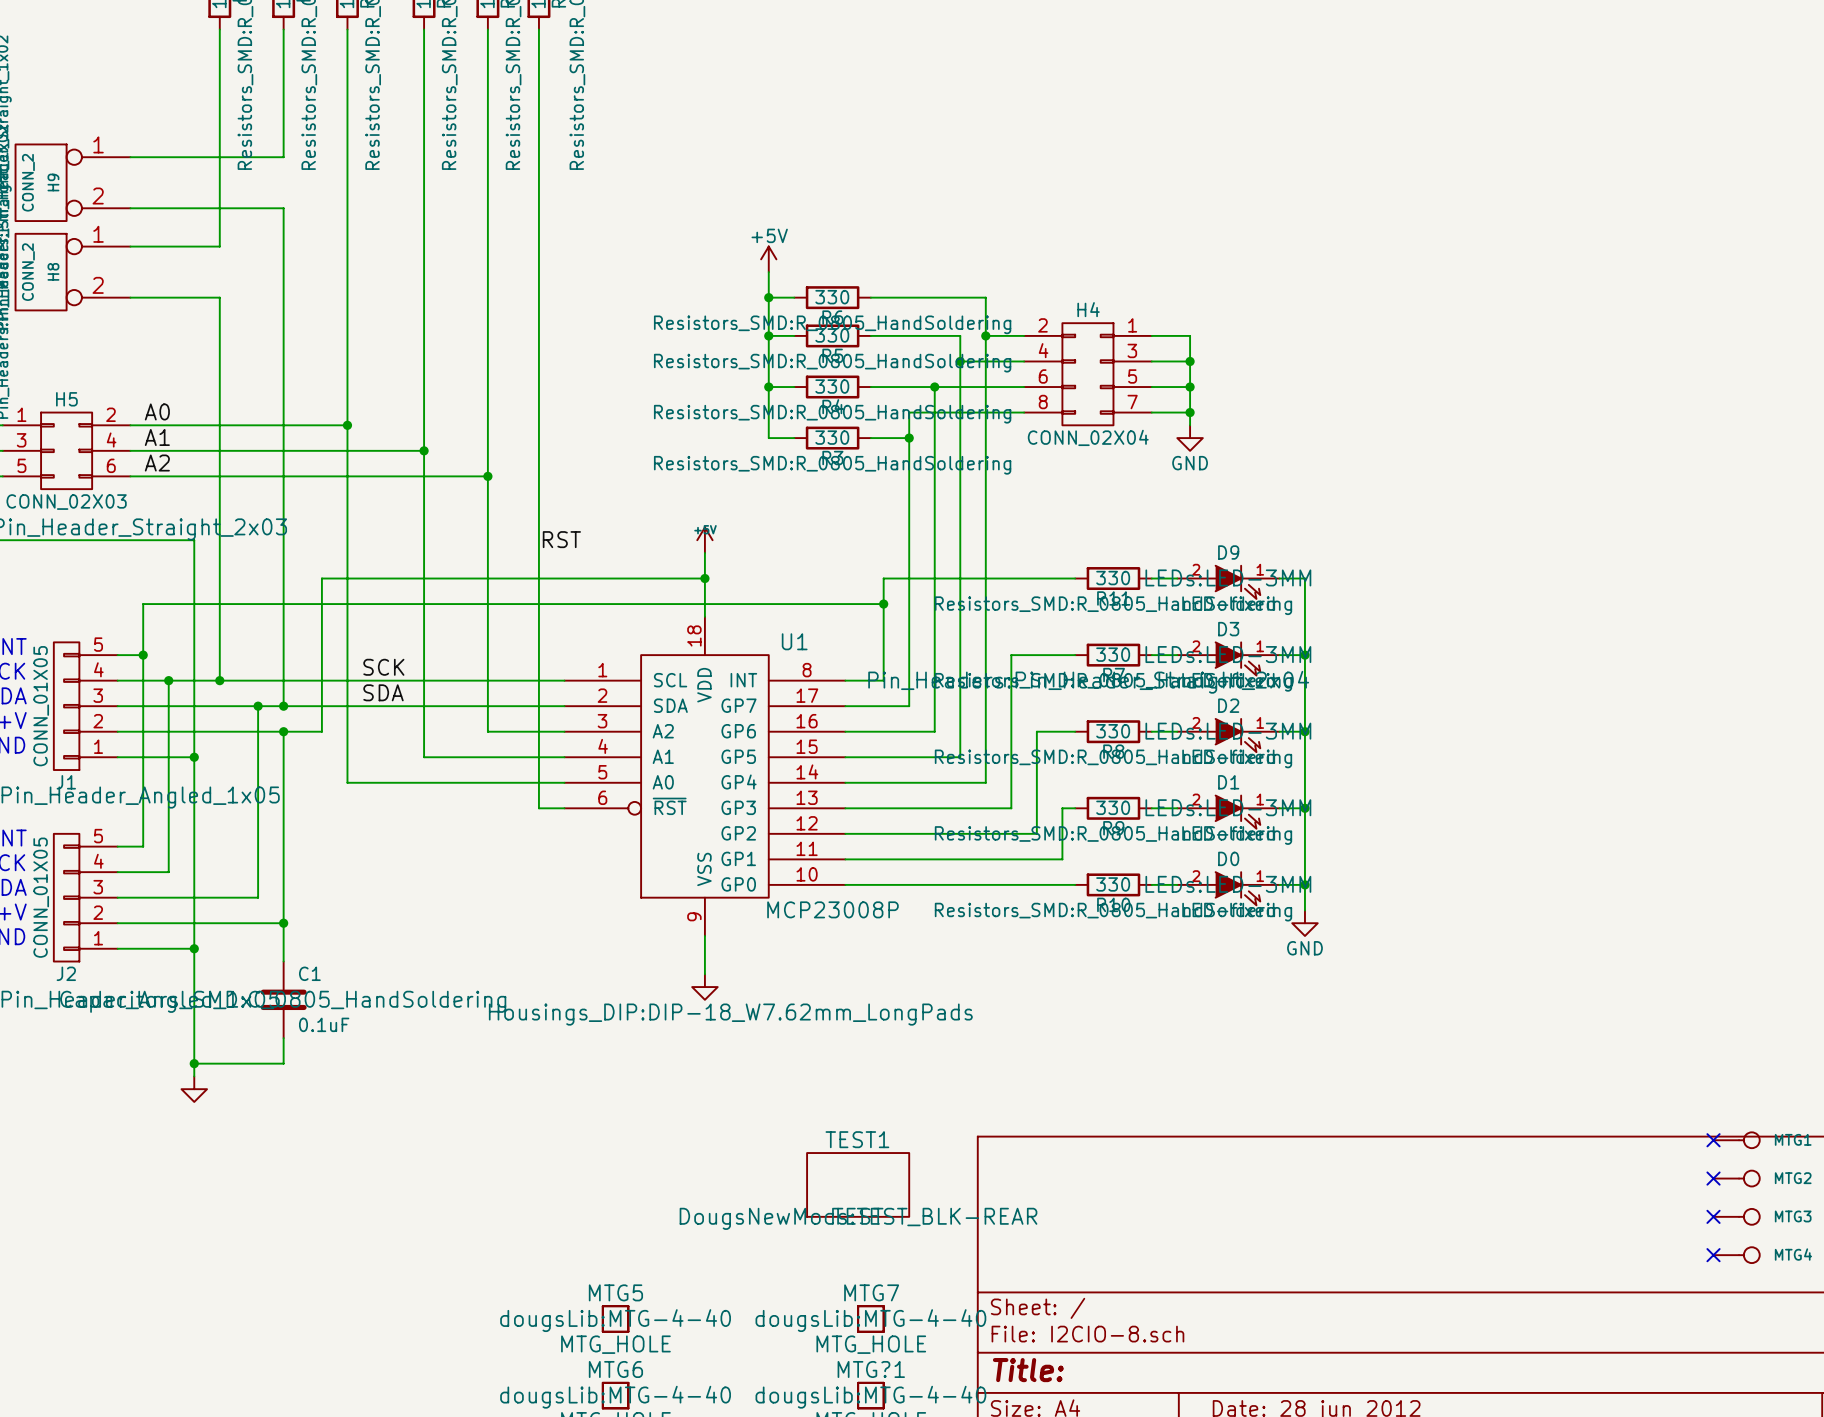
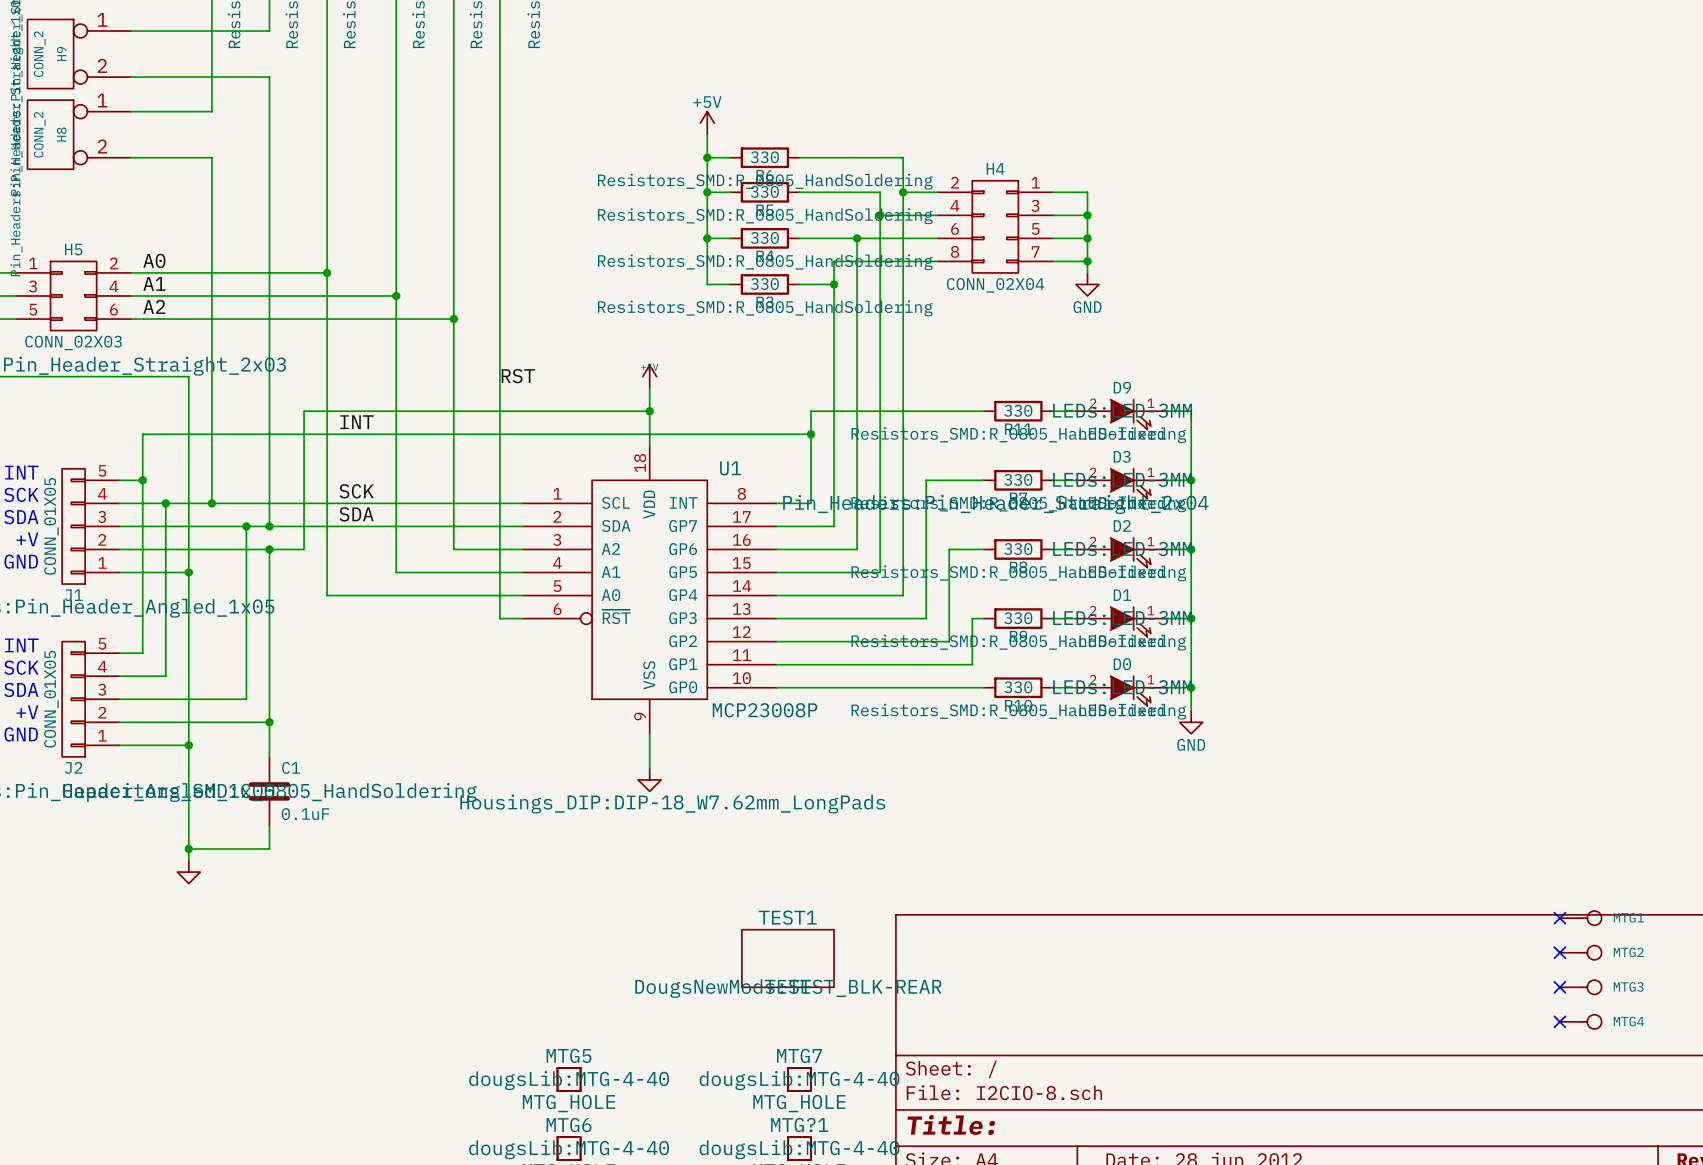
label: none -> INT (357, 422)

